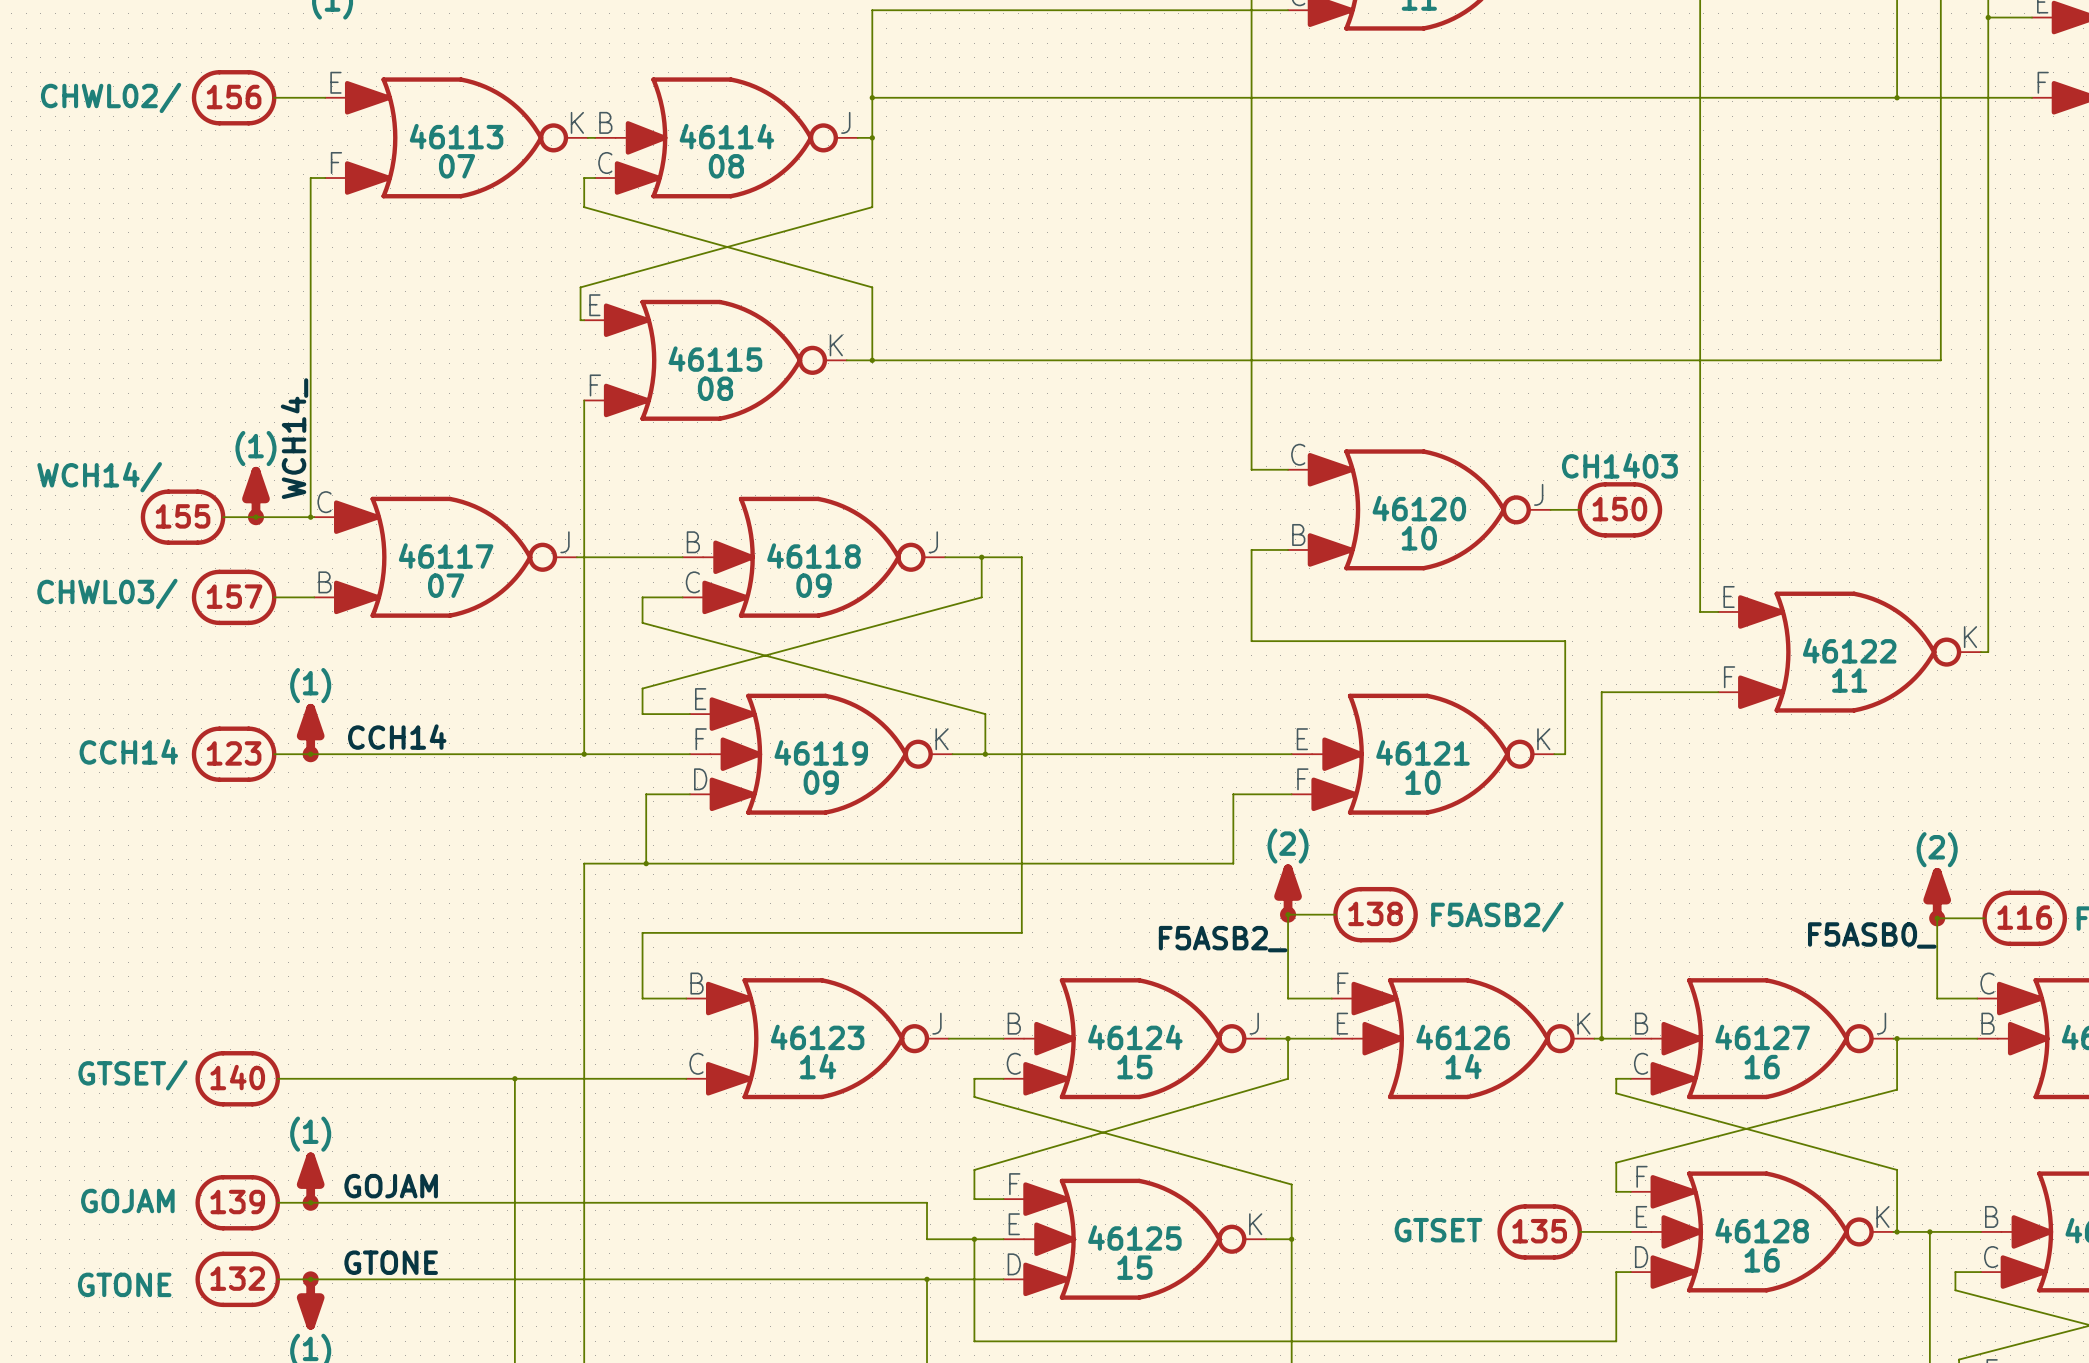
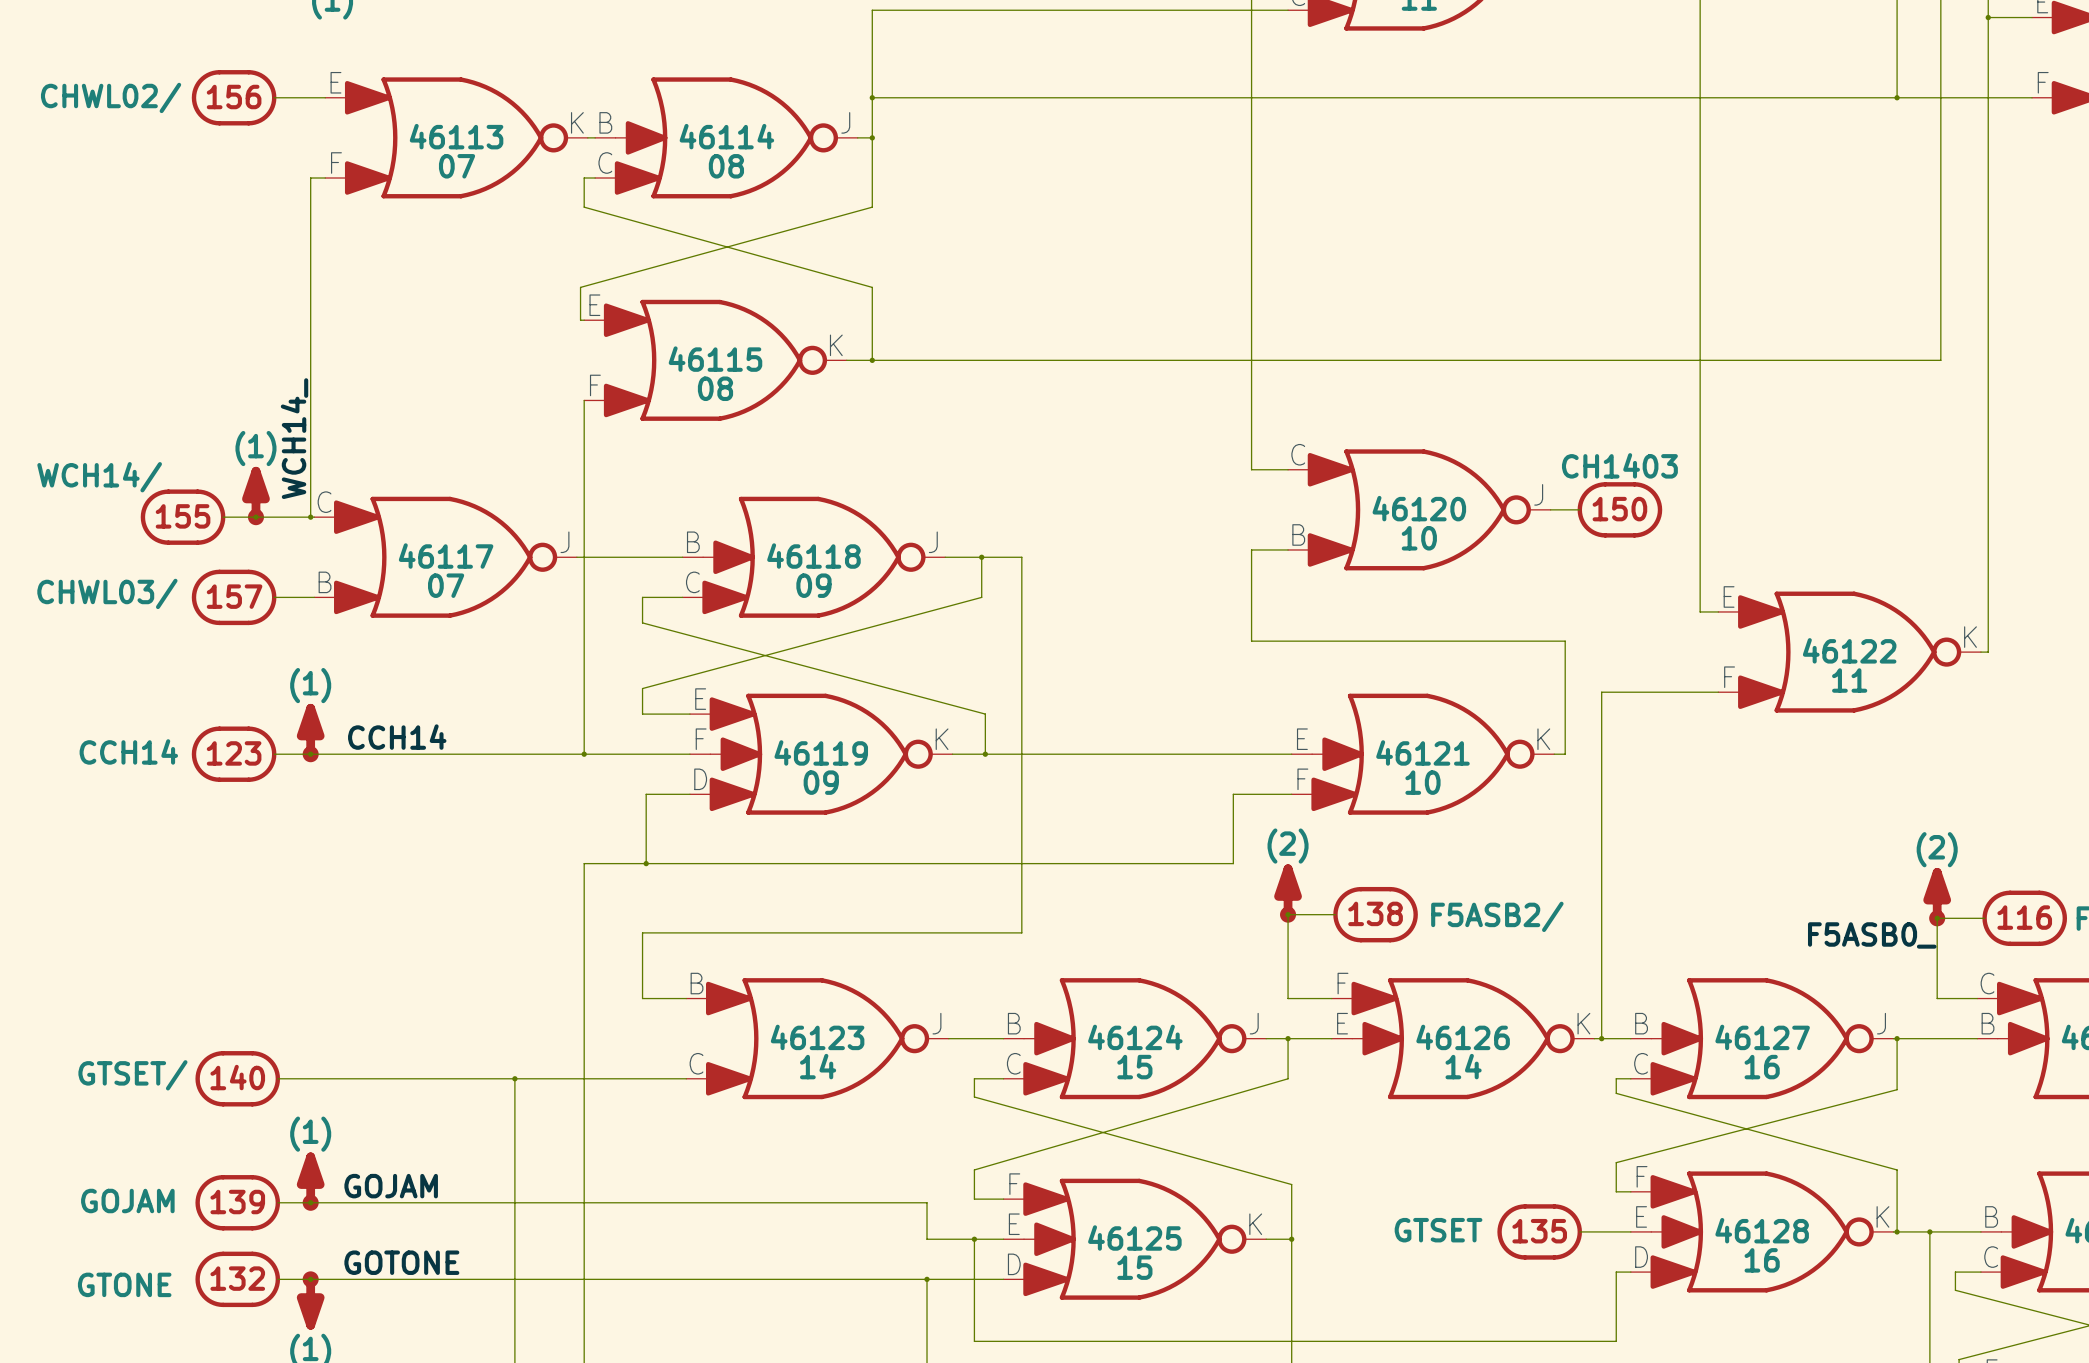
label: F5ASB2_ (1223, 939) -> none
label: GTONE (391, 1262) -> GOTONE (401, 1262)

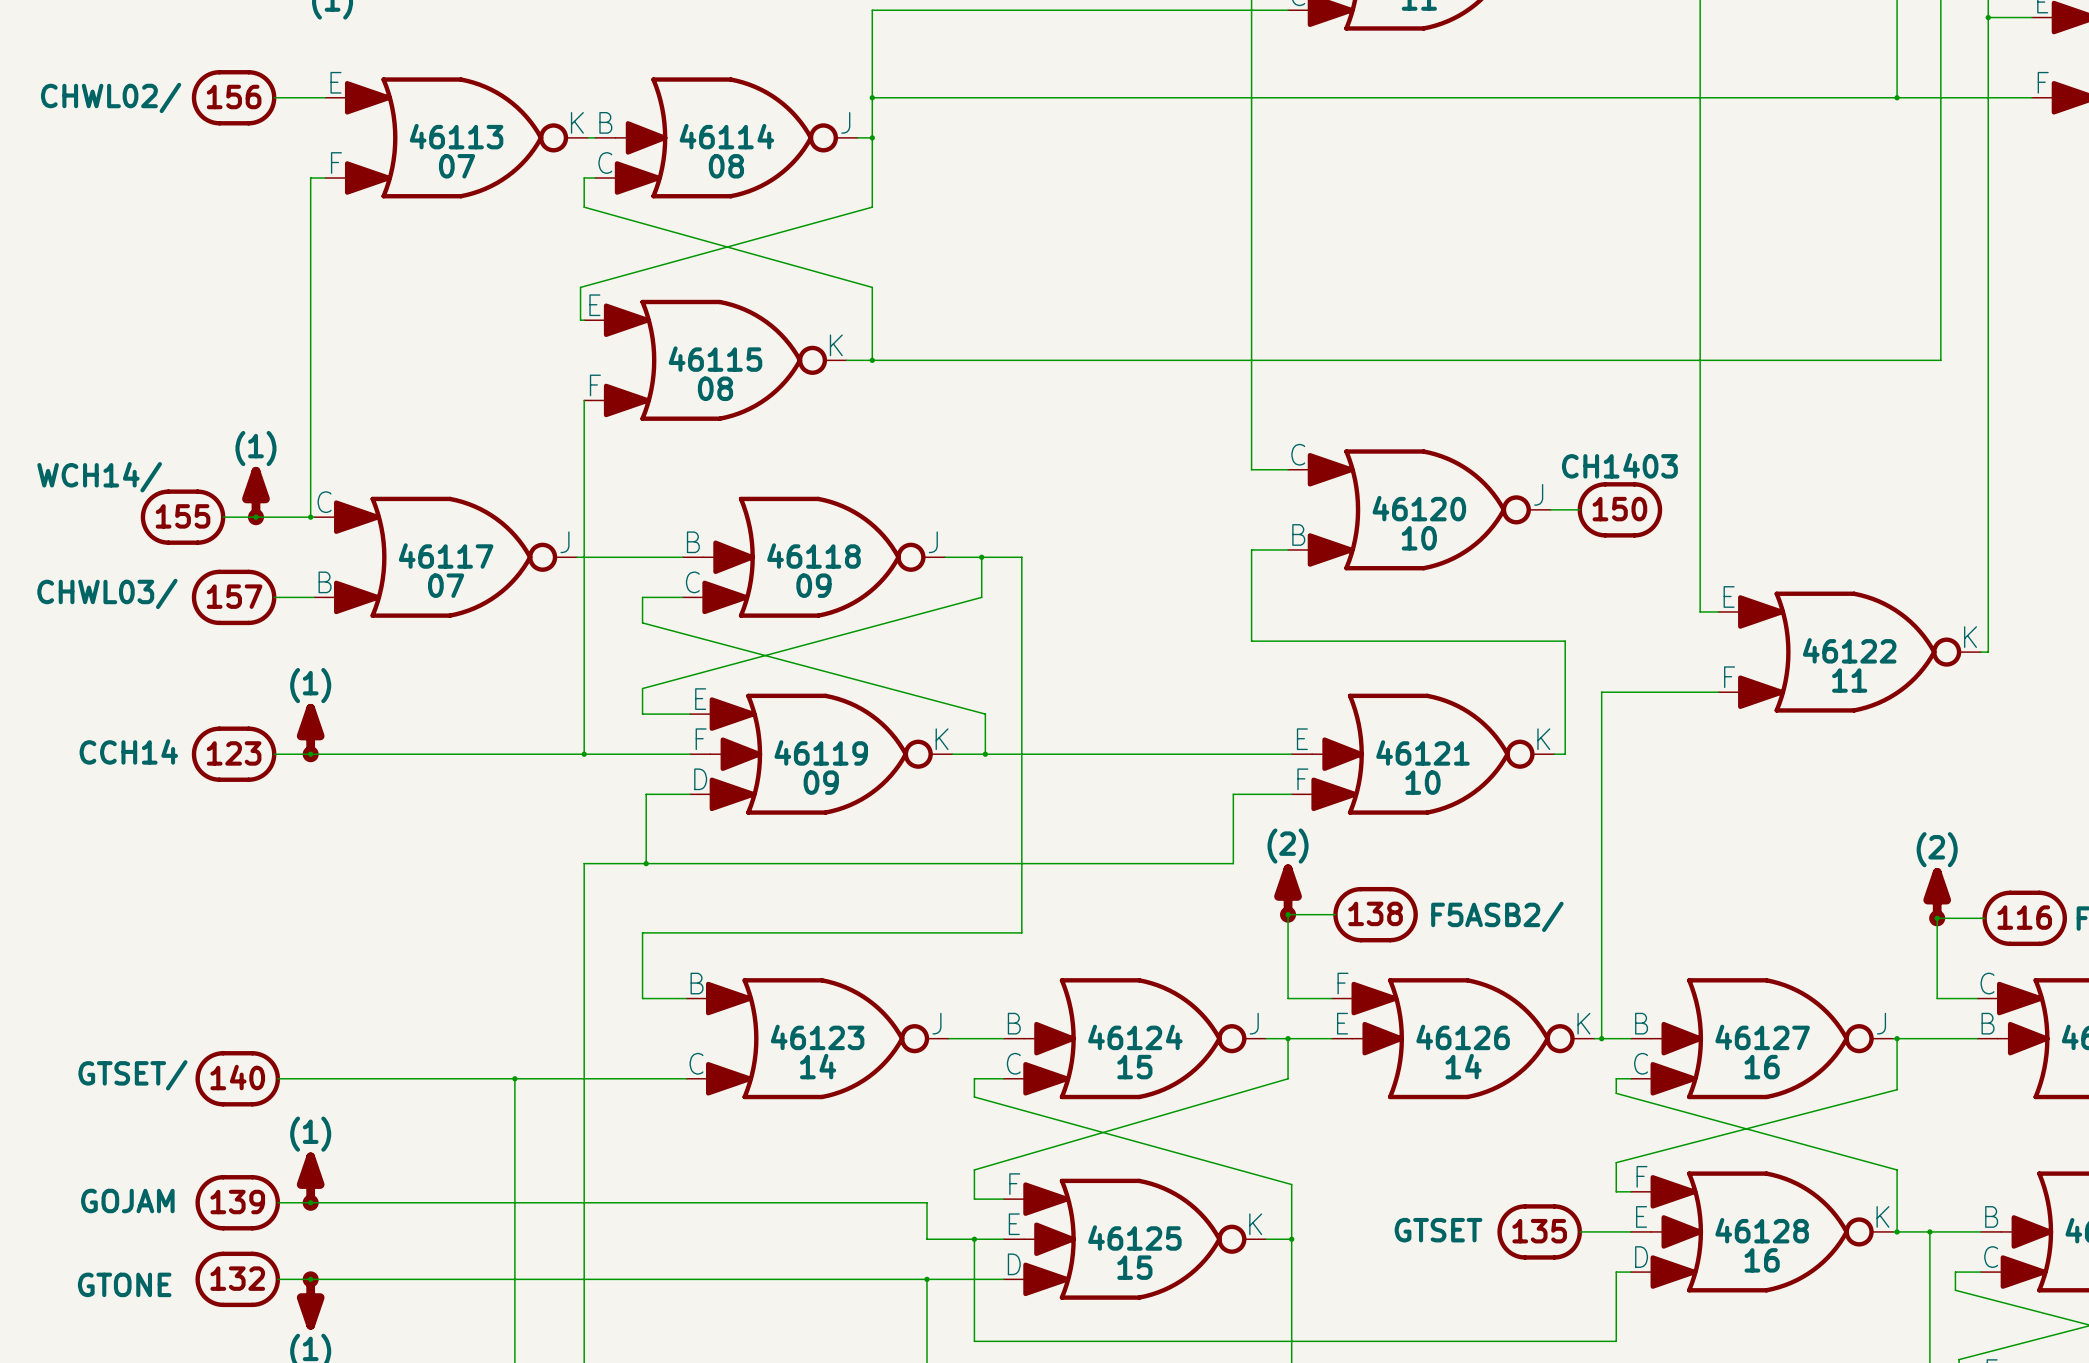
label: WCH14_ (294, 438) -> none
label: CCH14 (397, 737) -> none
label: F5ASB0_ (1872, 935) -> none
label: GOJAM (391, 1186) -> none
label: GOTONE (401, 1262) -> none

